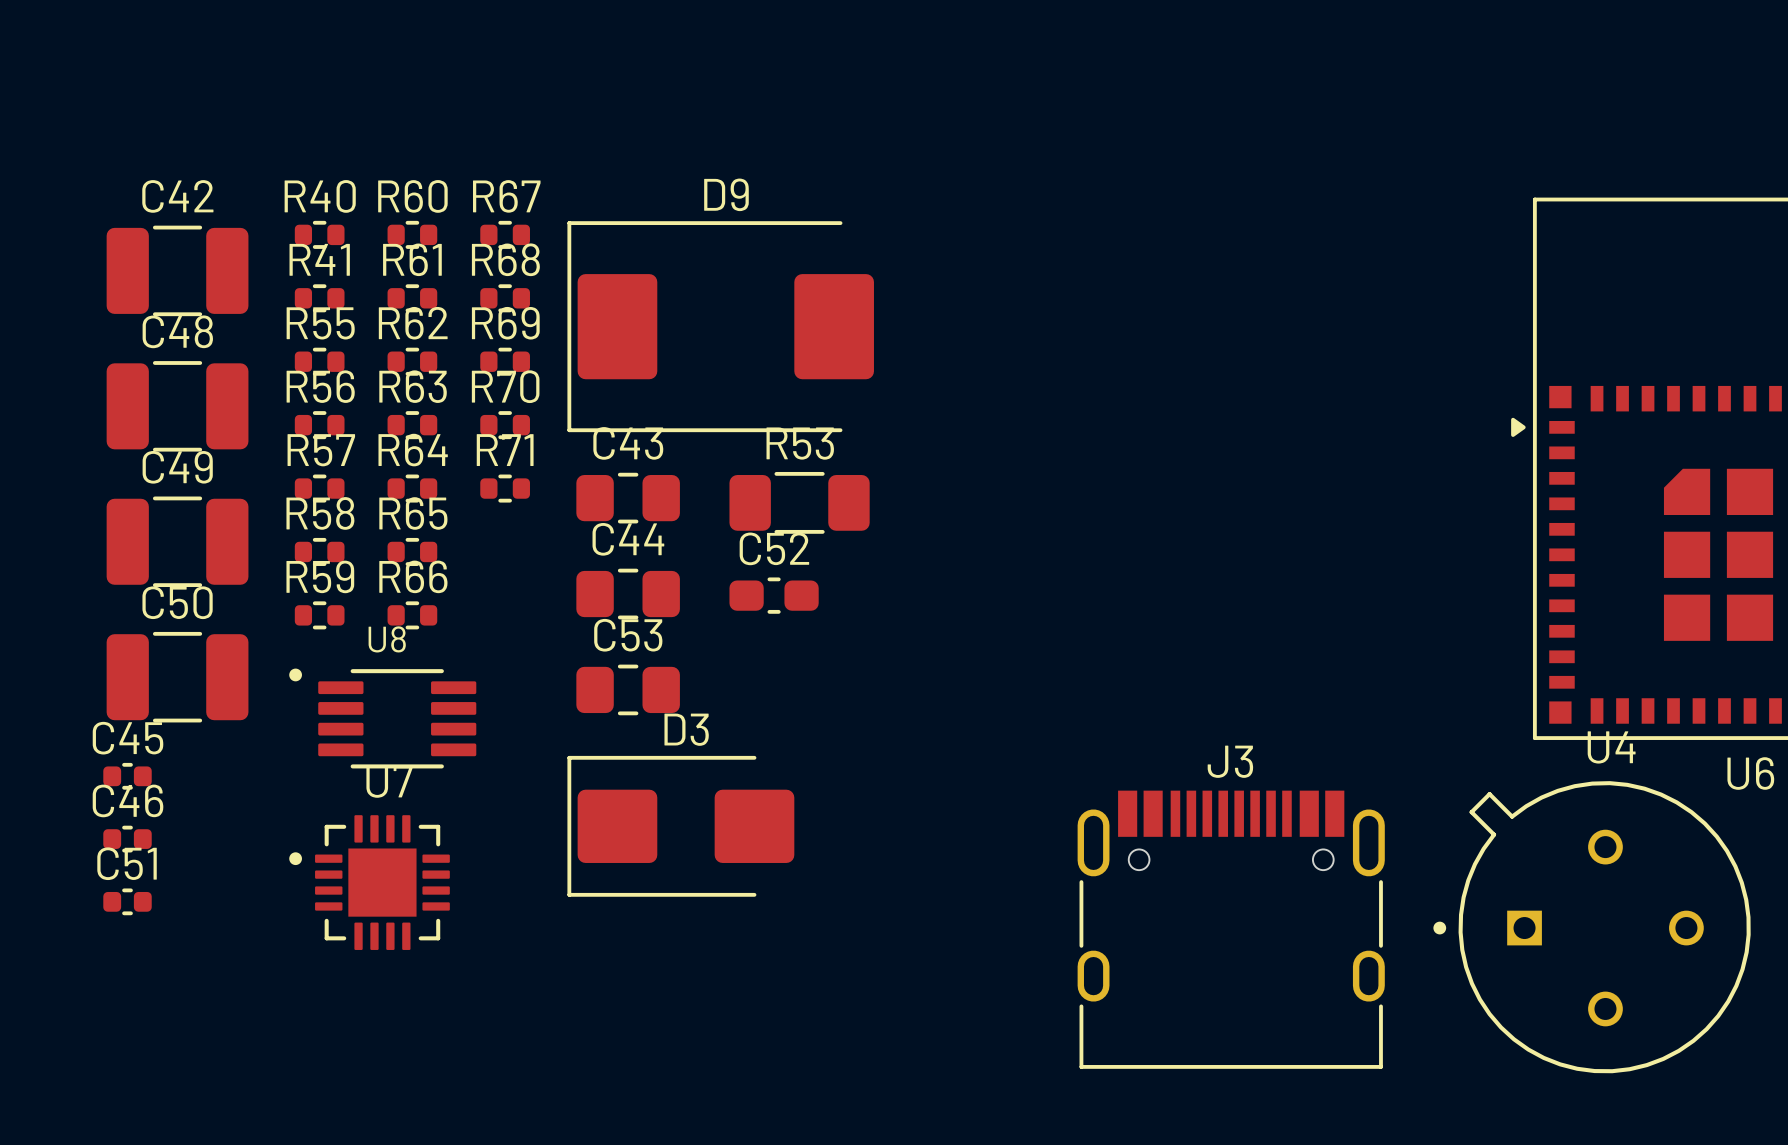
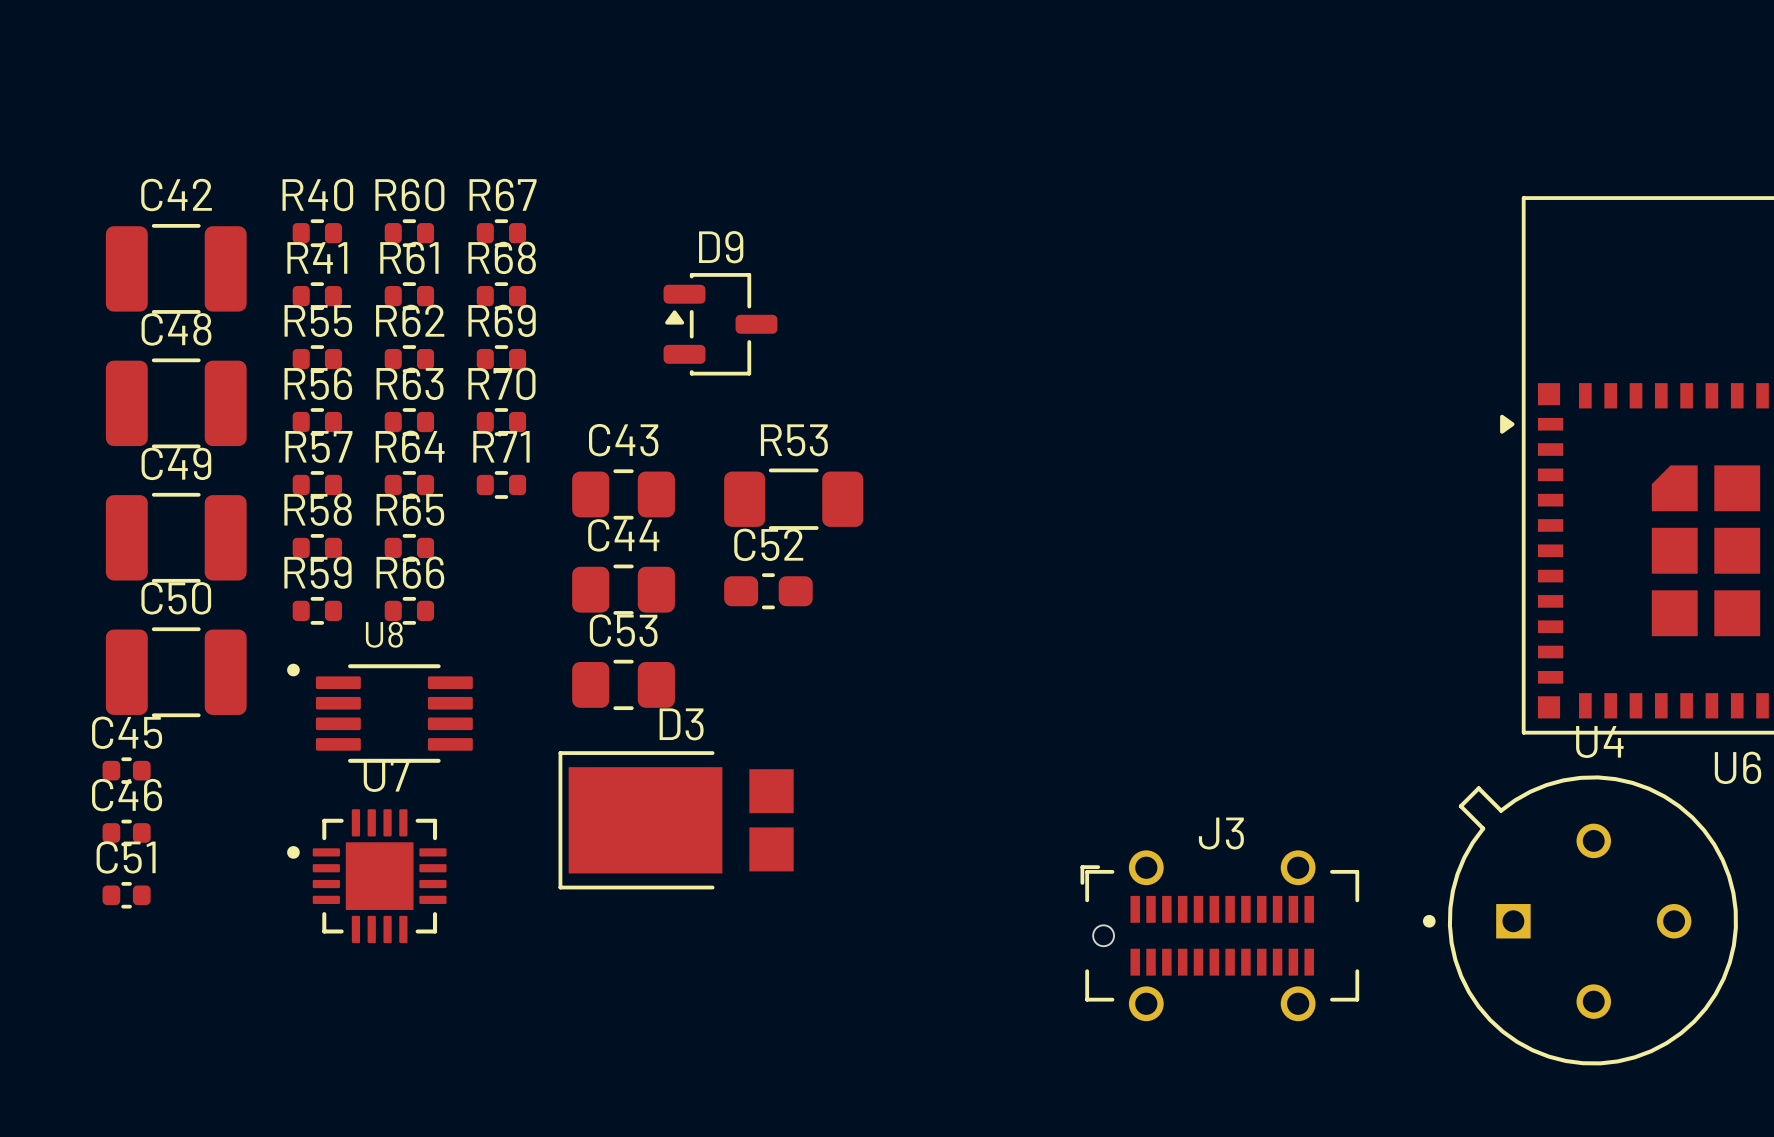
D9 footprint: [567, 221, 874, 433] -> [663, 273, 778, 376]
D3 footprint: [567, 755, 795, 897] -> [558, 751, 794, 890]
J3 name position: J3 (1230, 761) -> J3 (1221, 833)
J3 footprint: [1077, 790, 1385, 1069] -> [1080, 850, 1360, 1022]

